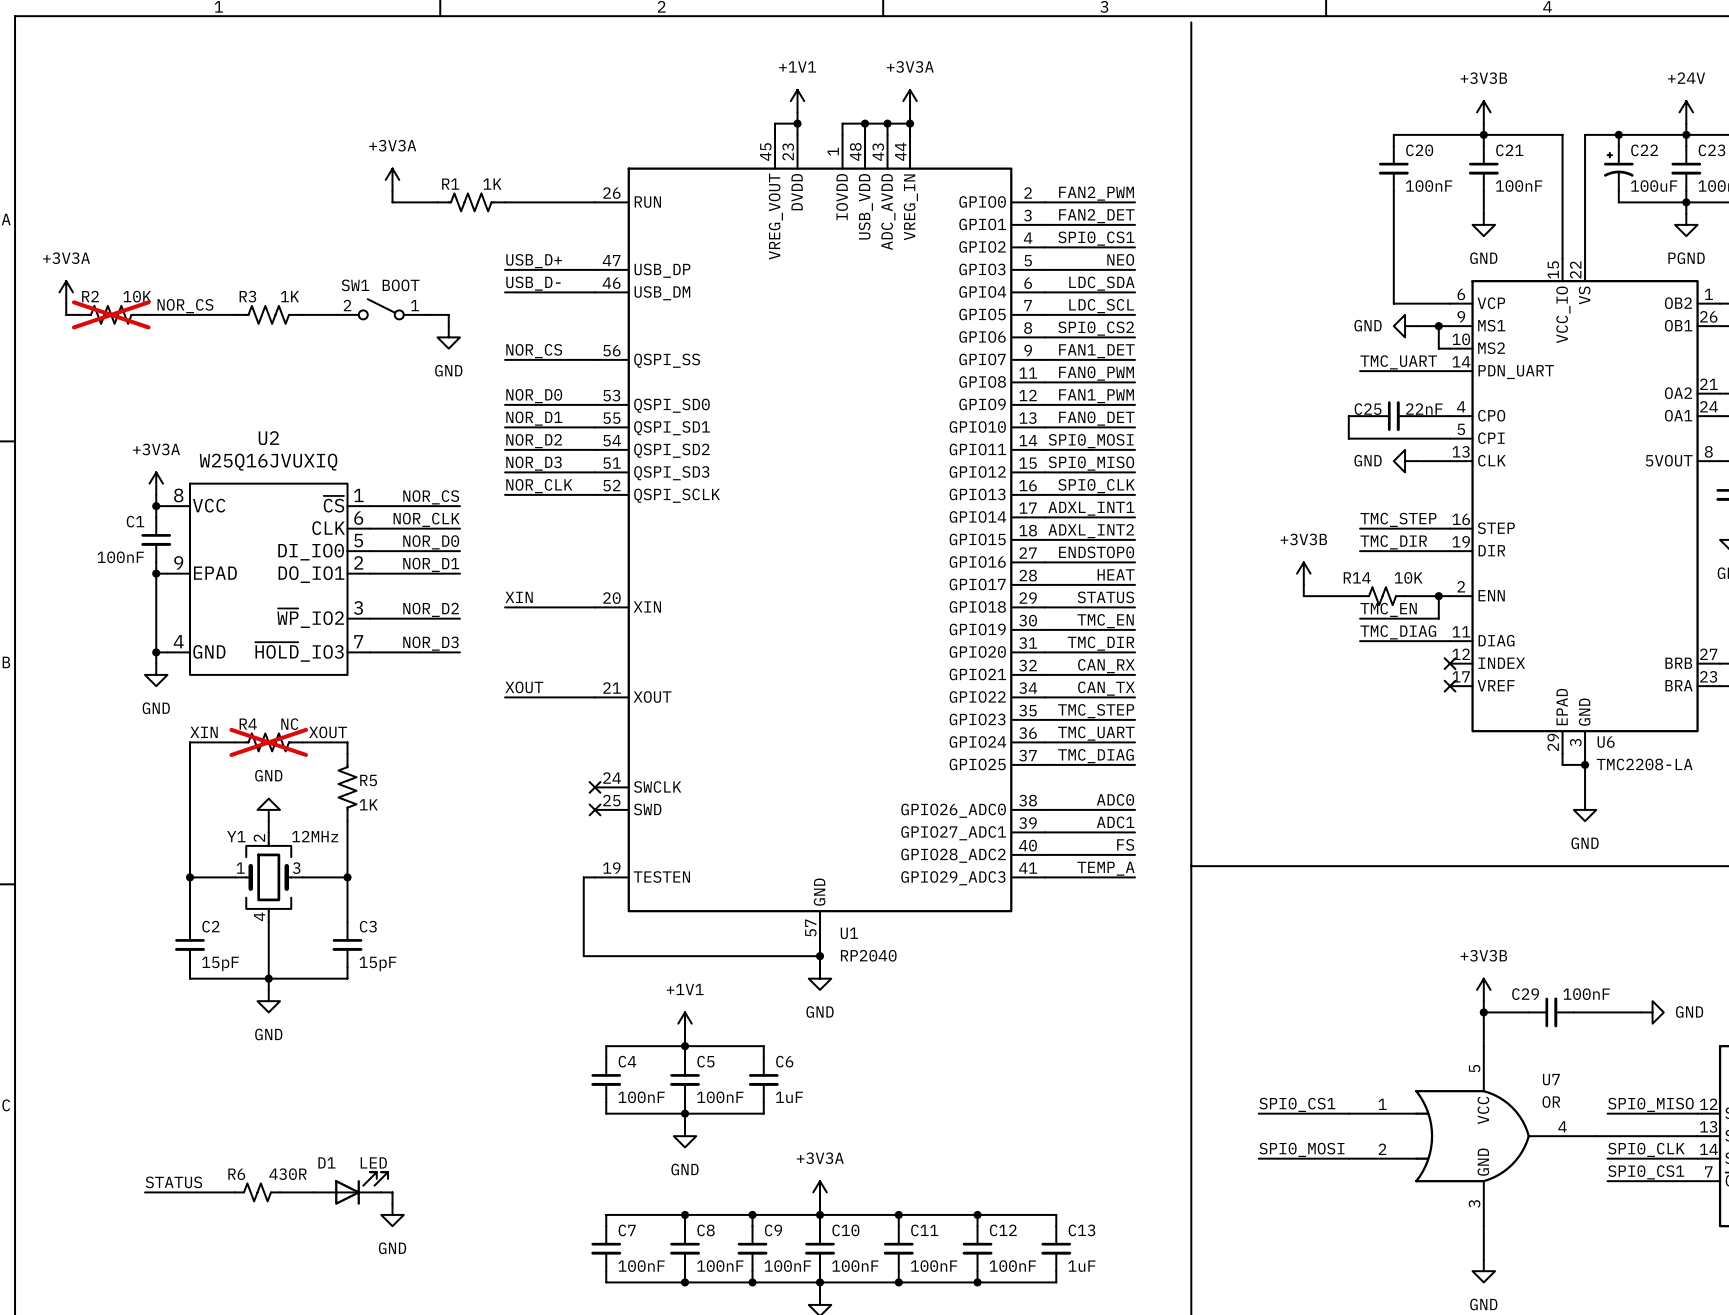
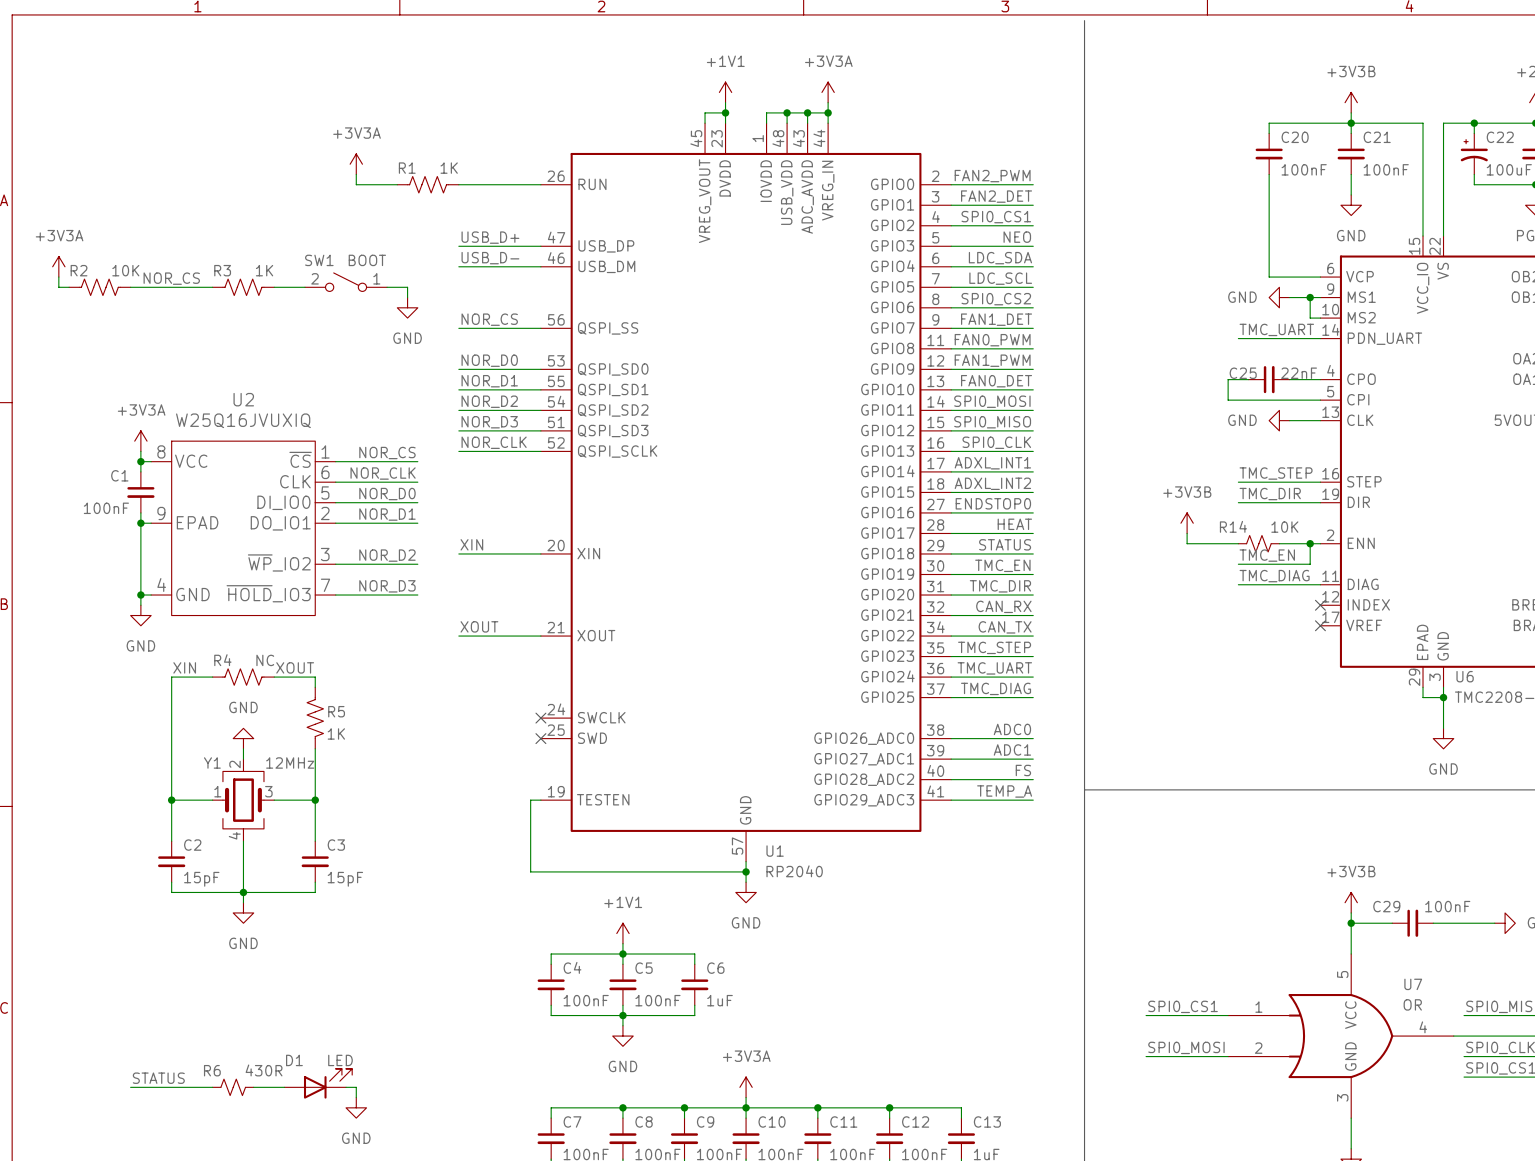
R2 do-not-place cross: (111, 314) -> none
R4 do-not-place cross: (268, 742) -> none

